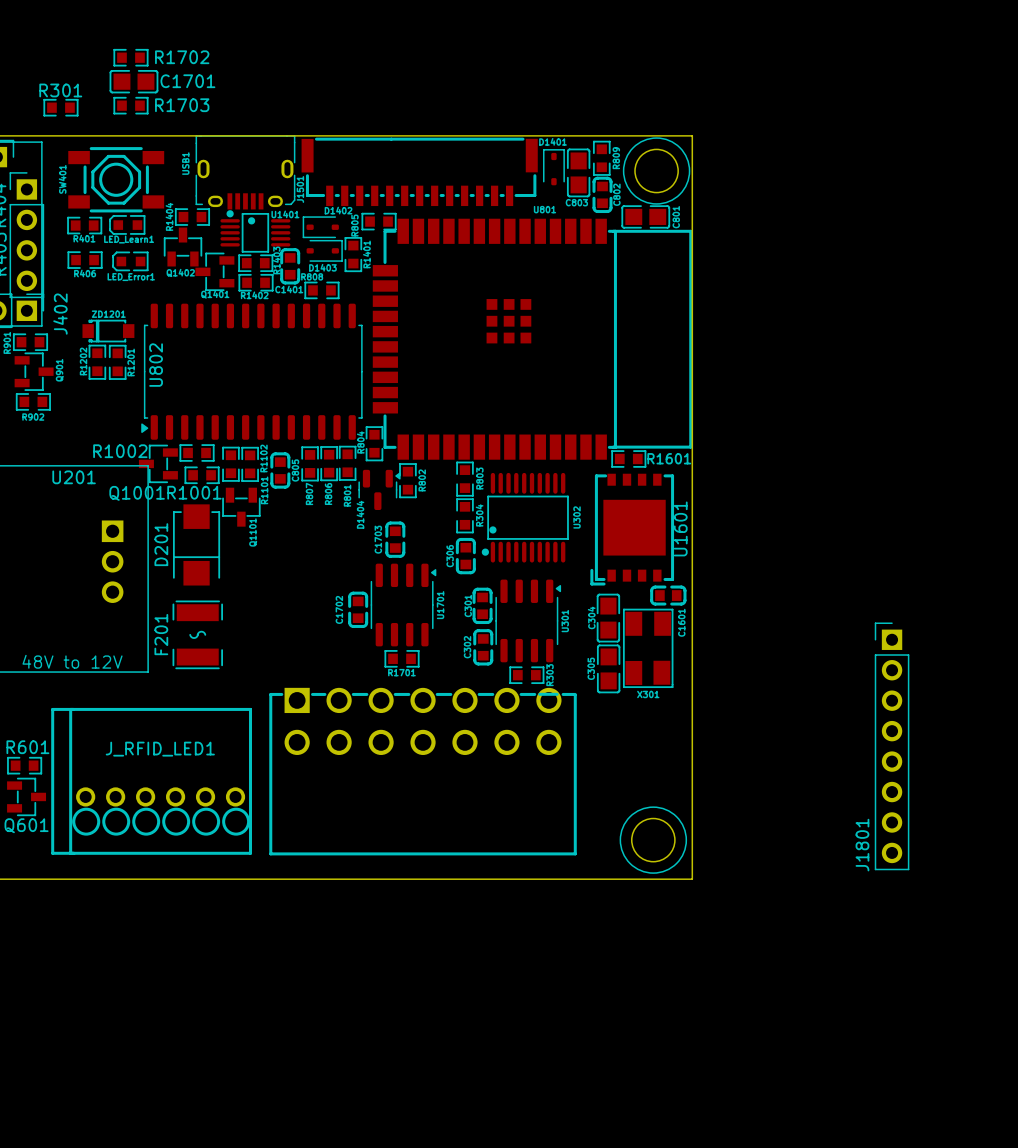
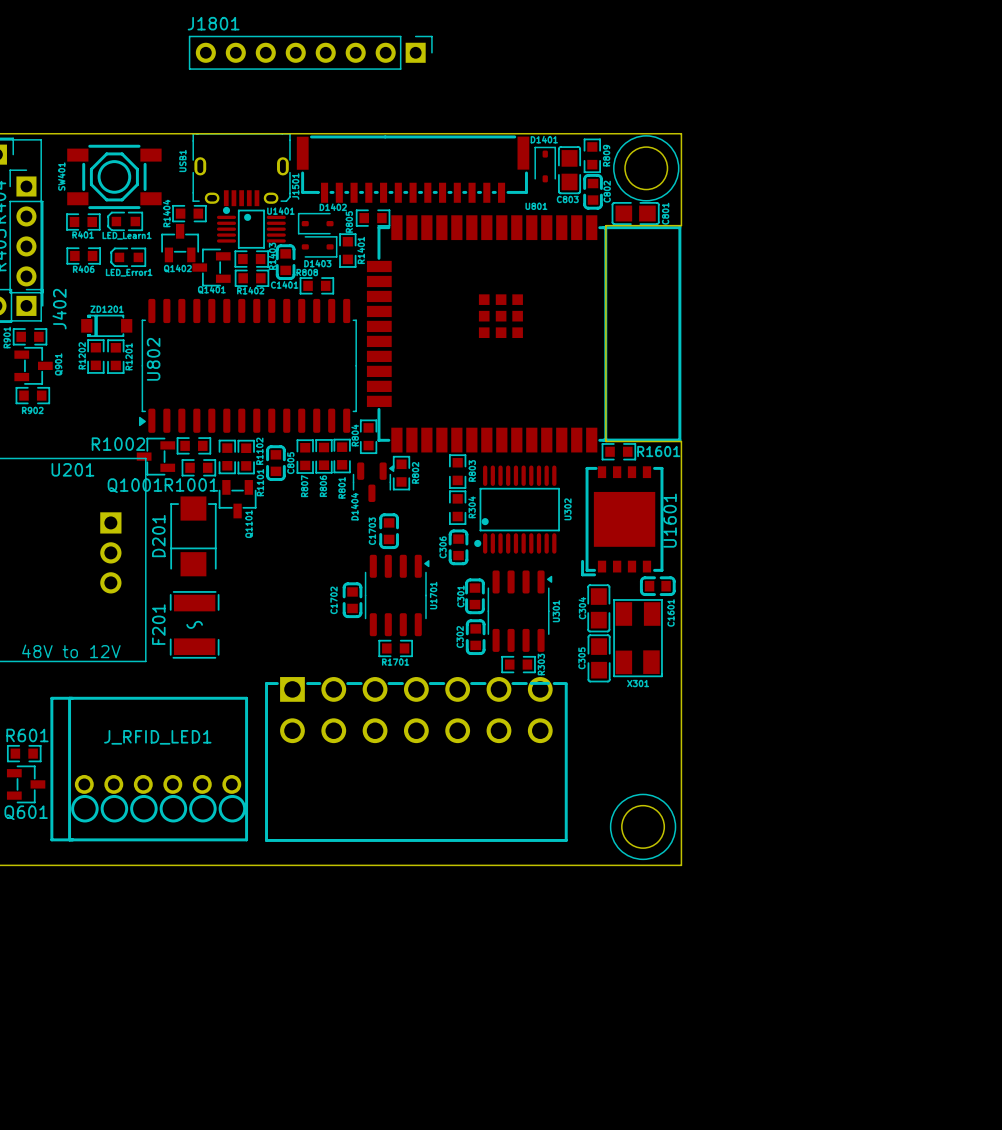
R1702: (130, 57) -> none
C1701: (133, 81) -> none
R1703: (130, 105) -> none
R301: (60, 107) -> none
board edge: (692, 229) (692, 448) -> (681, 225) (605, 225) (605, 441) (681, 441)
J1801 rotation: 0° (892, 746) -> 90° clockwise (310, 52)
J1801 position: (892, 746) -> (310, 52)

